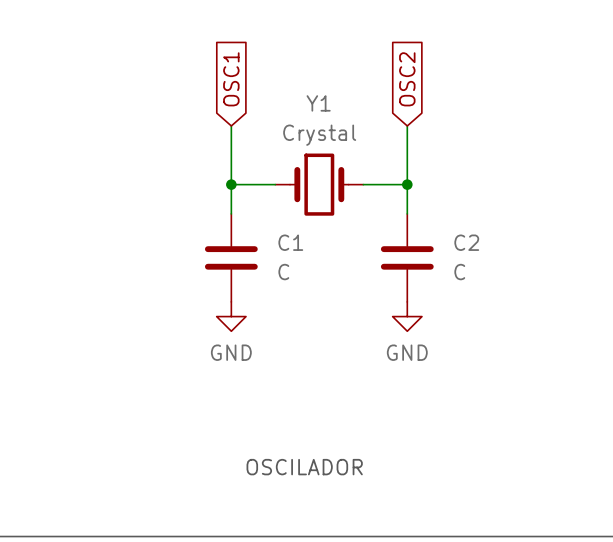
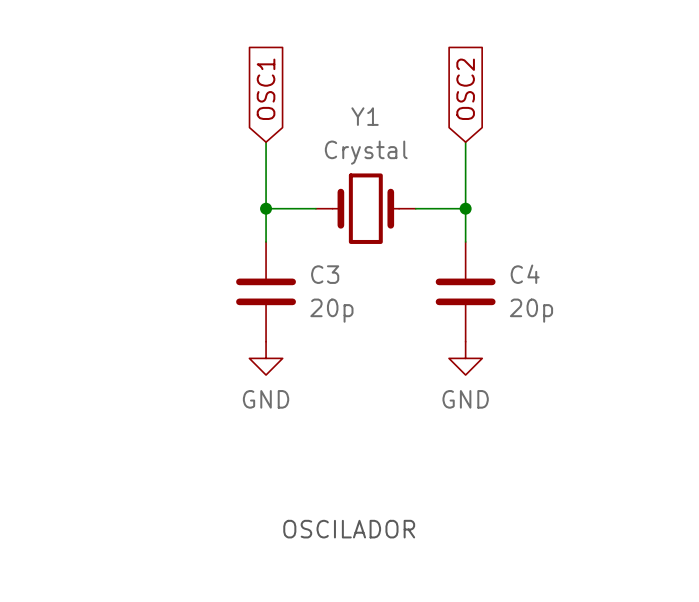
C1 name: C1 (290, 242) -> C3 (325, 274)
C2 name: C2 (466, 242) -> C4 (525, 274)
C1 value: C (283, 272) -> 20p (331, 310)
C2 value: C (459, 272) -> 20p (531, 310)

